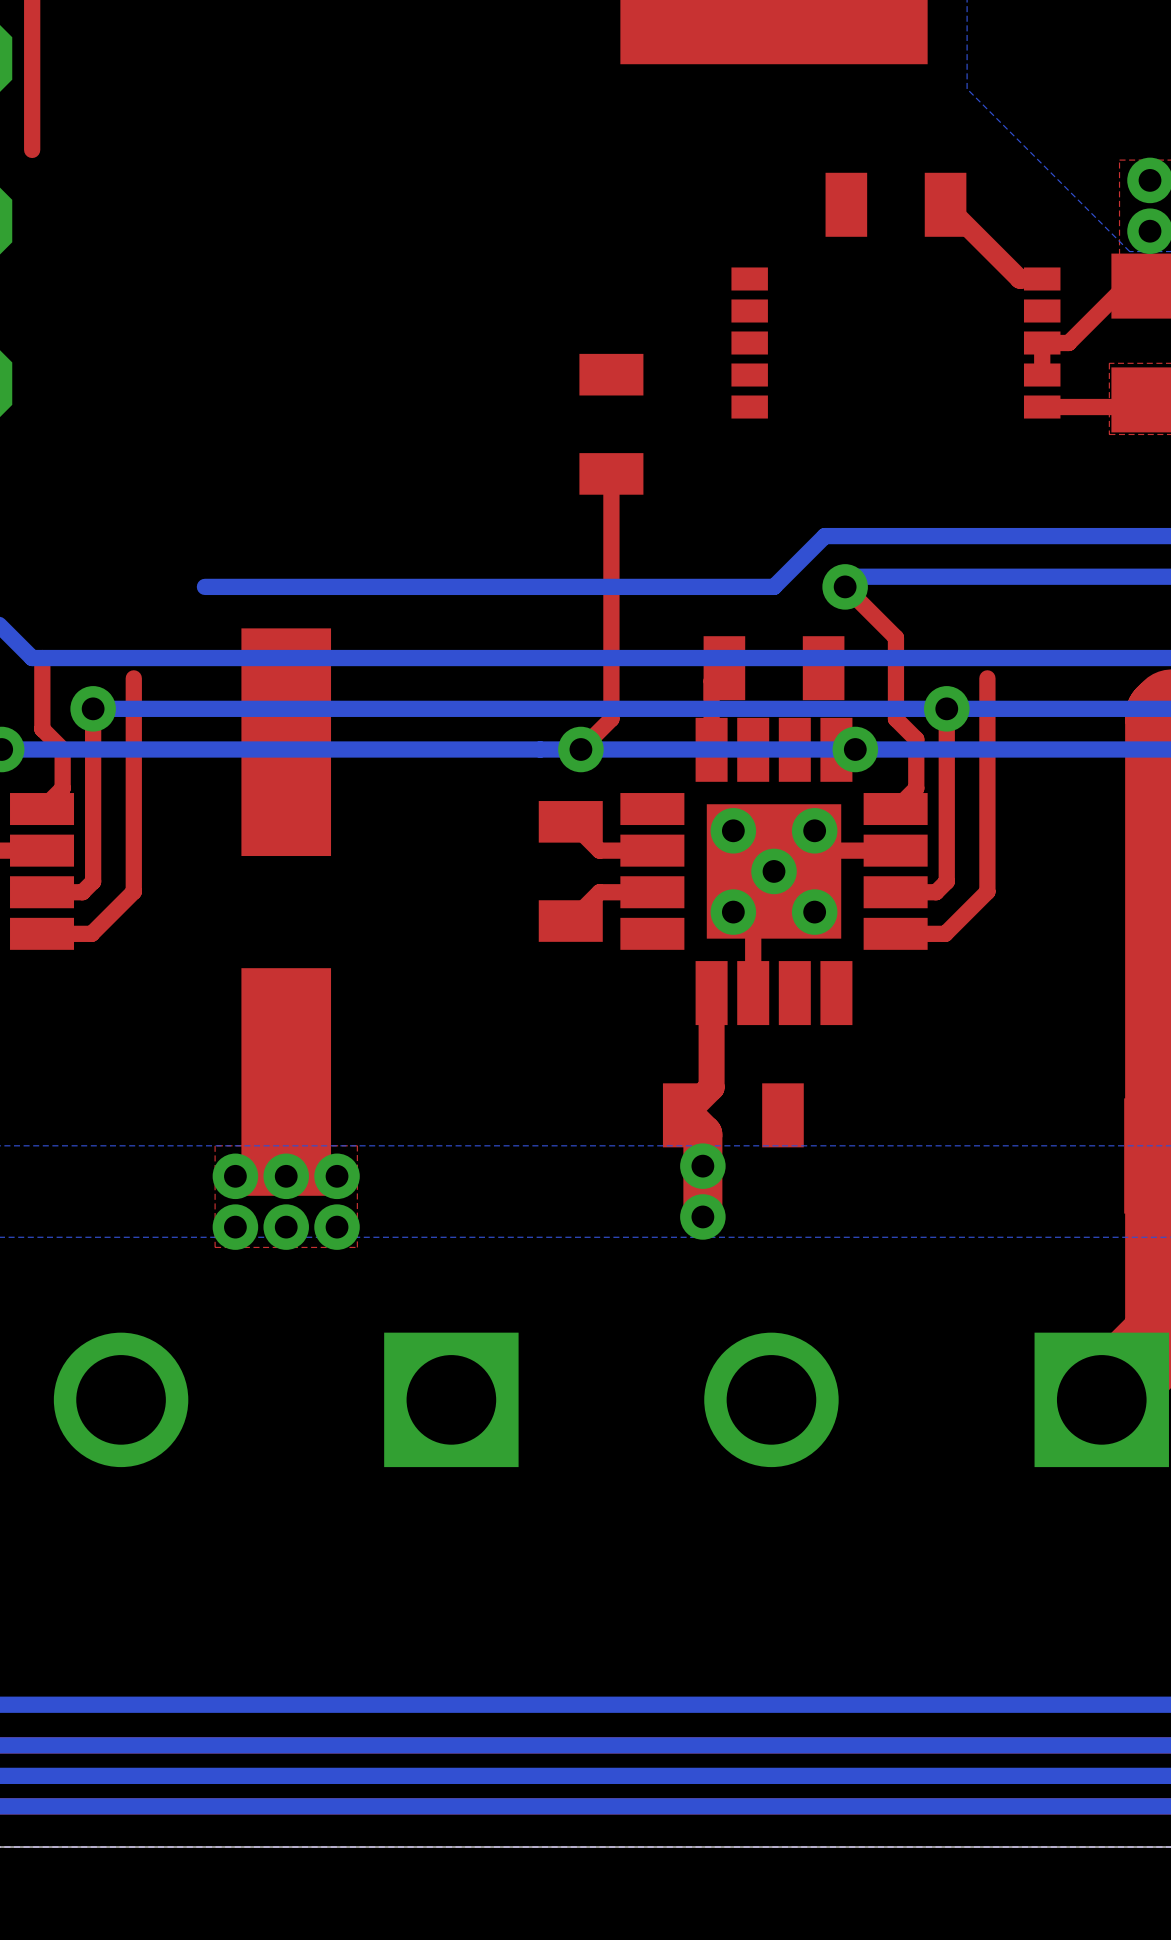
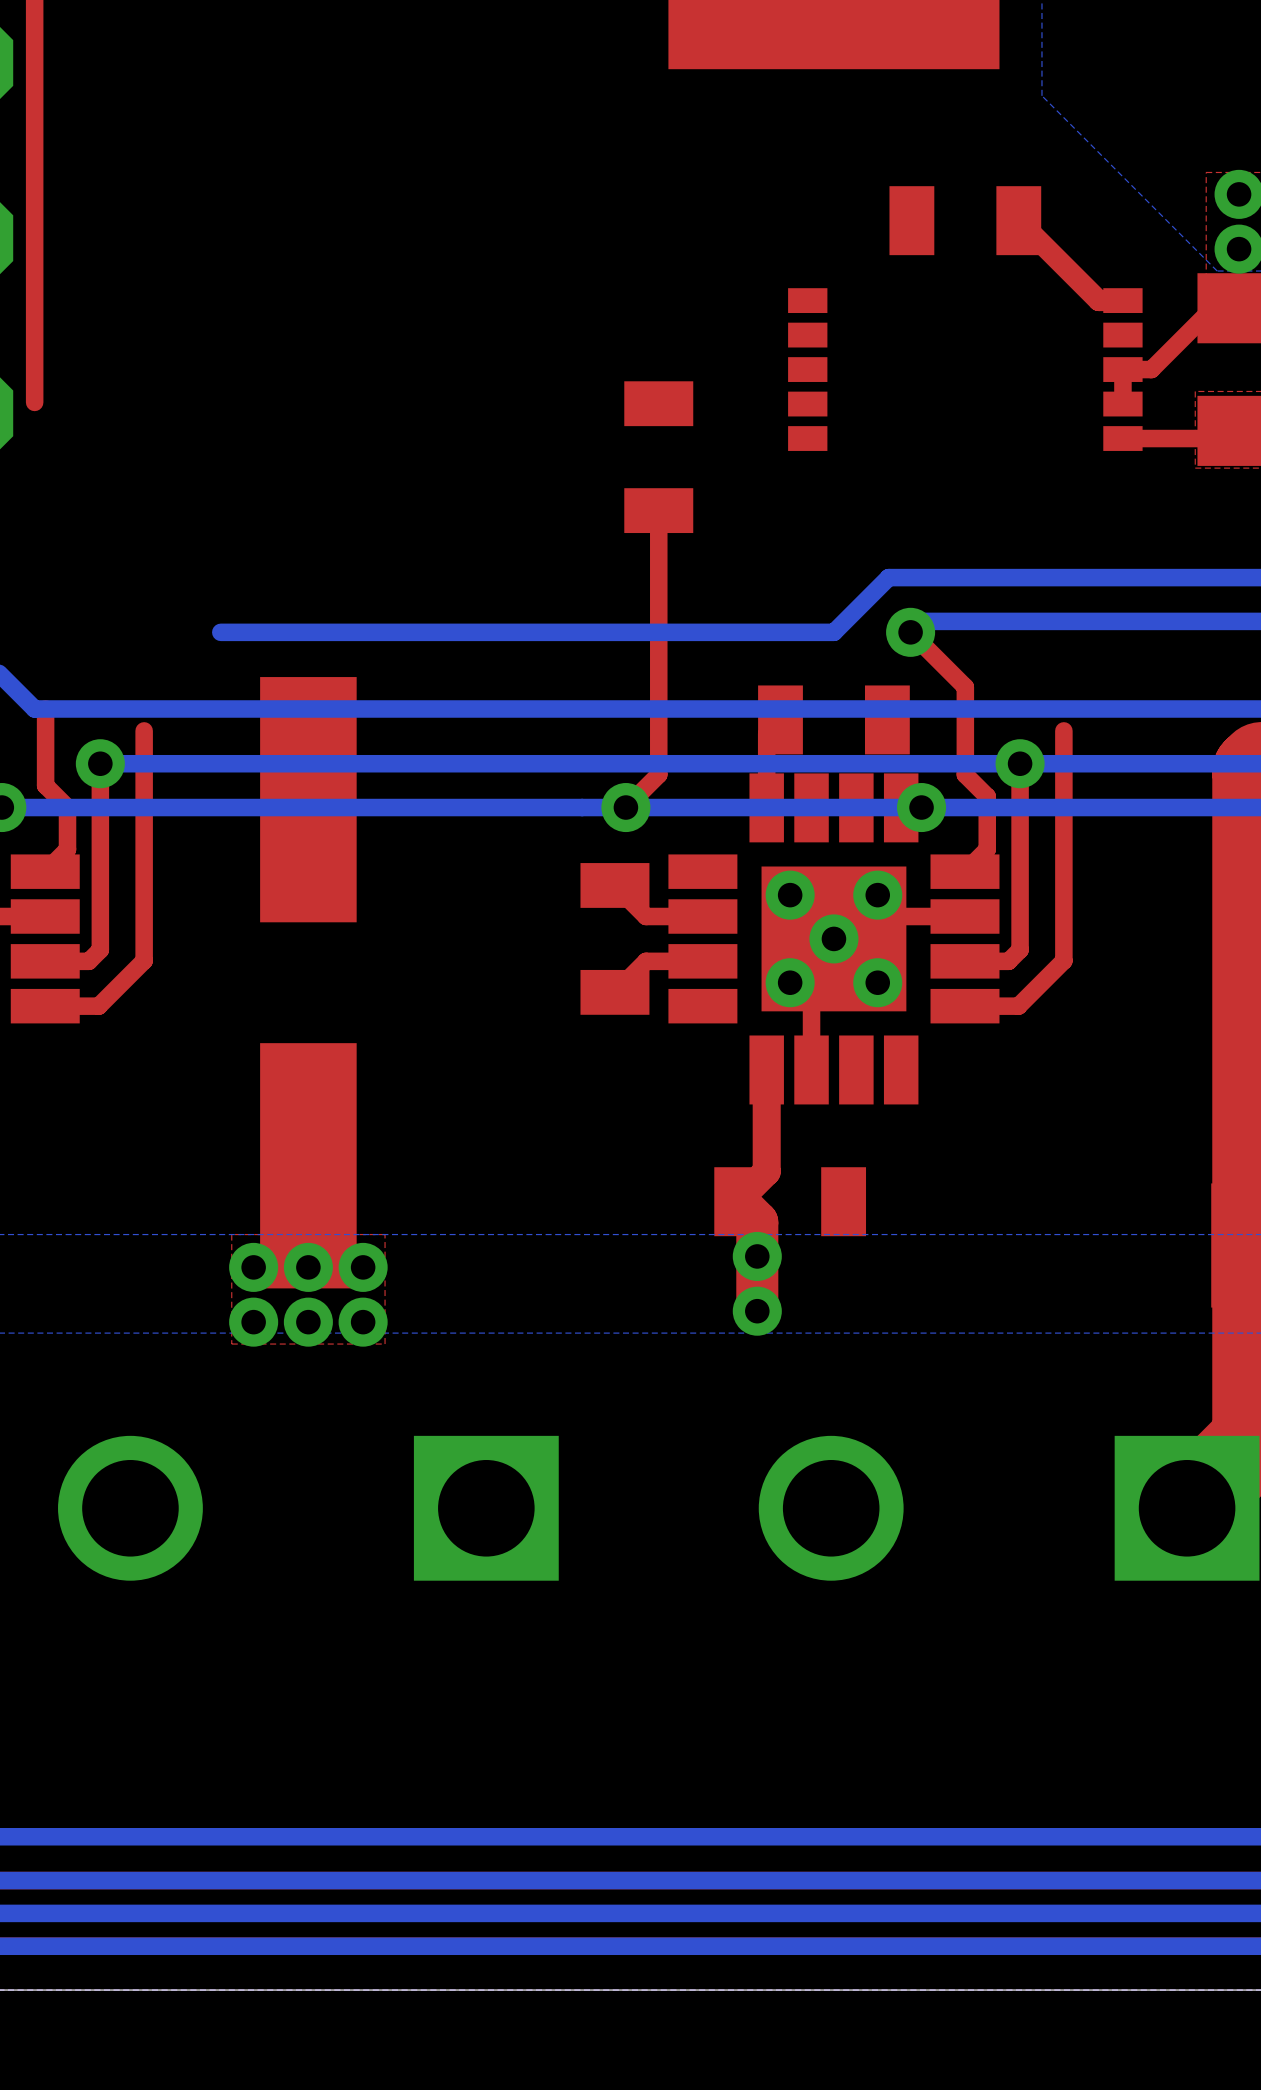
top track: none -> (34, 161) (34, 402)

